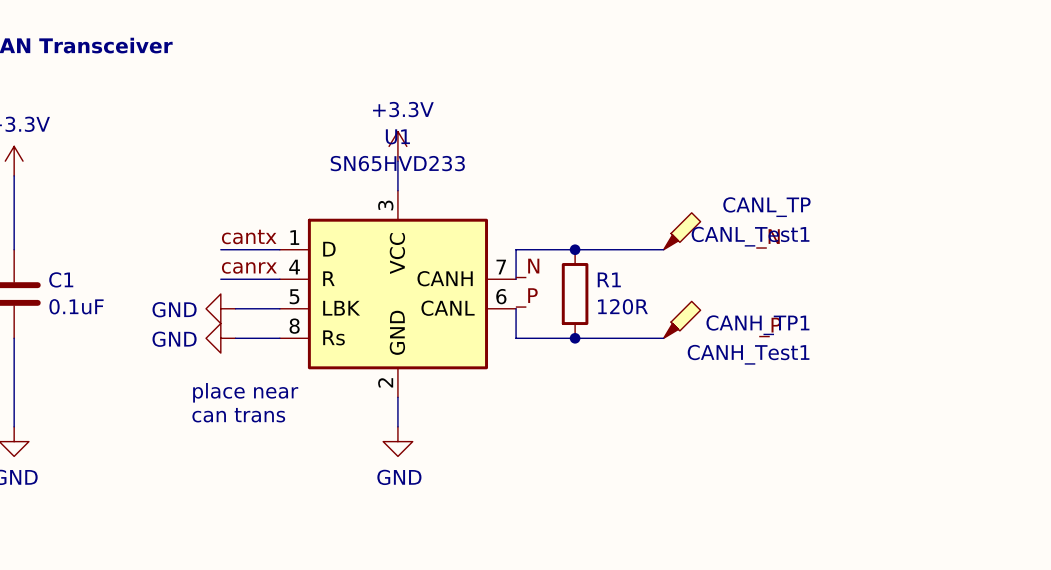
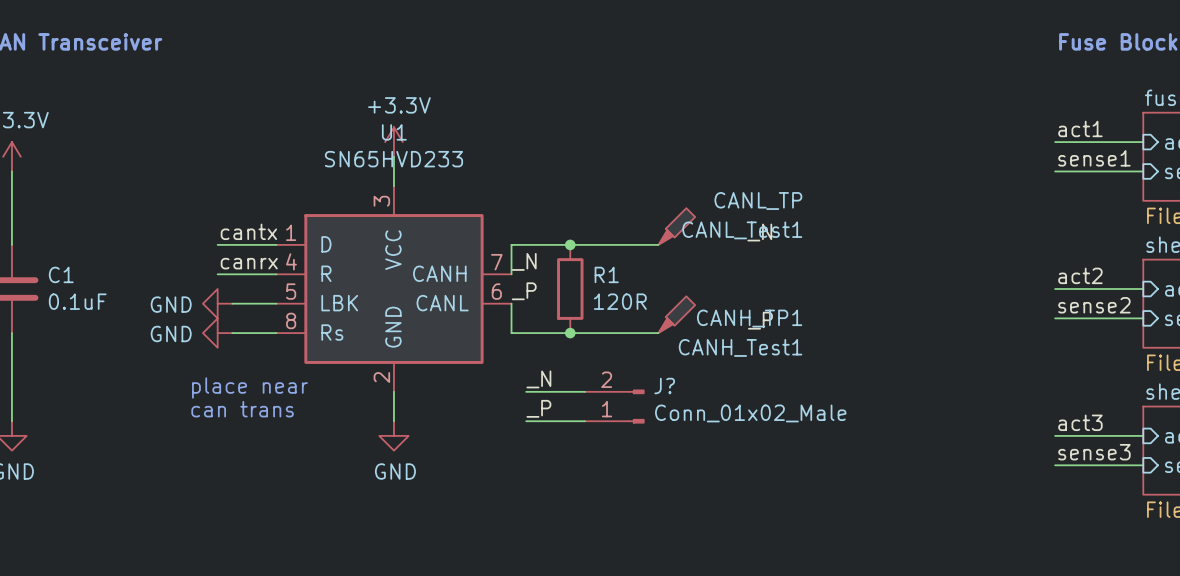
label: none -> _N (538, 379)
wire: none -> (526, 391) (584, 391)
J?: none -> Conn_01x02_Male (614, 406)
label: none -> _P (538, 408)
wire: none -> (526, 421) (584, 421)

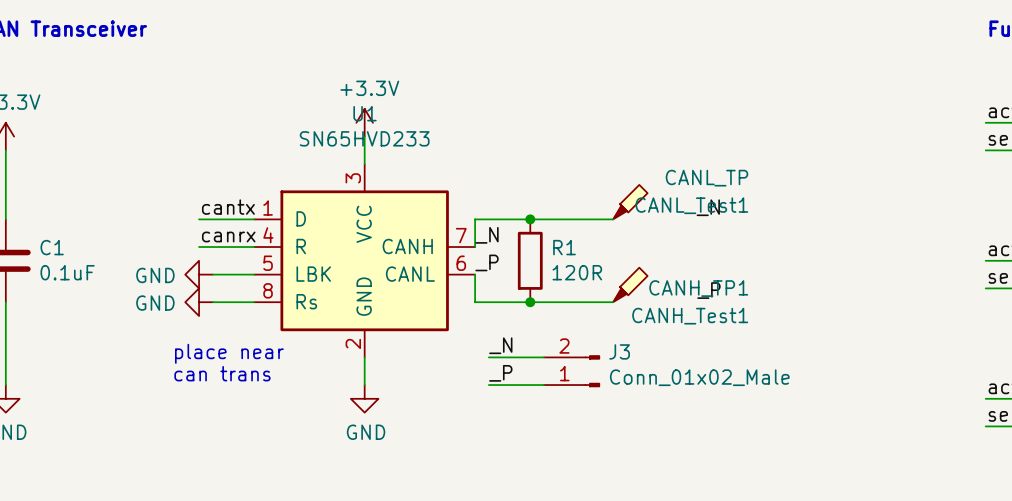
J? name: J? (664, 386) -> J3 (619, 351)

